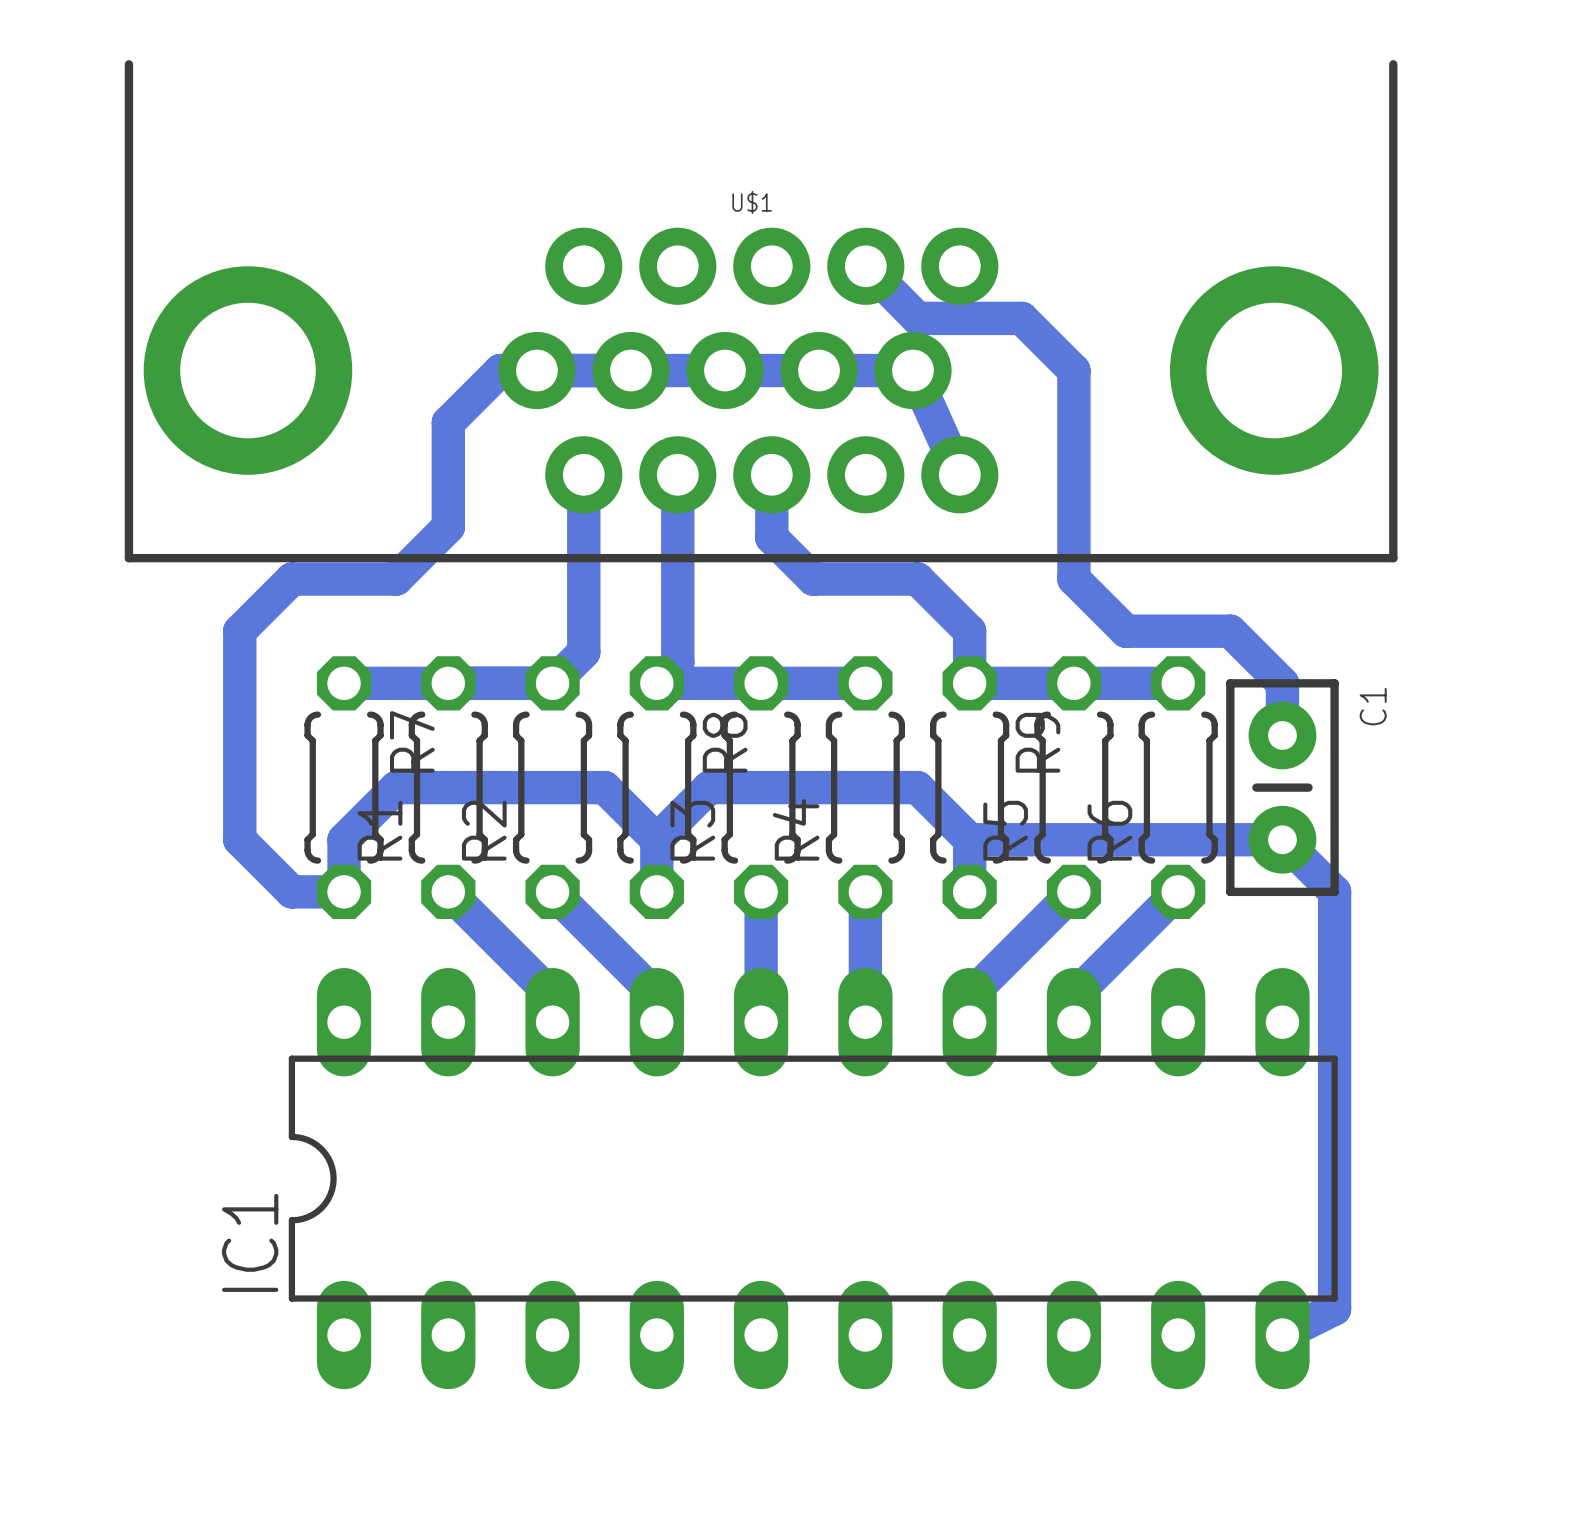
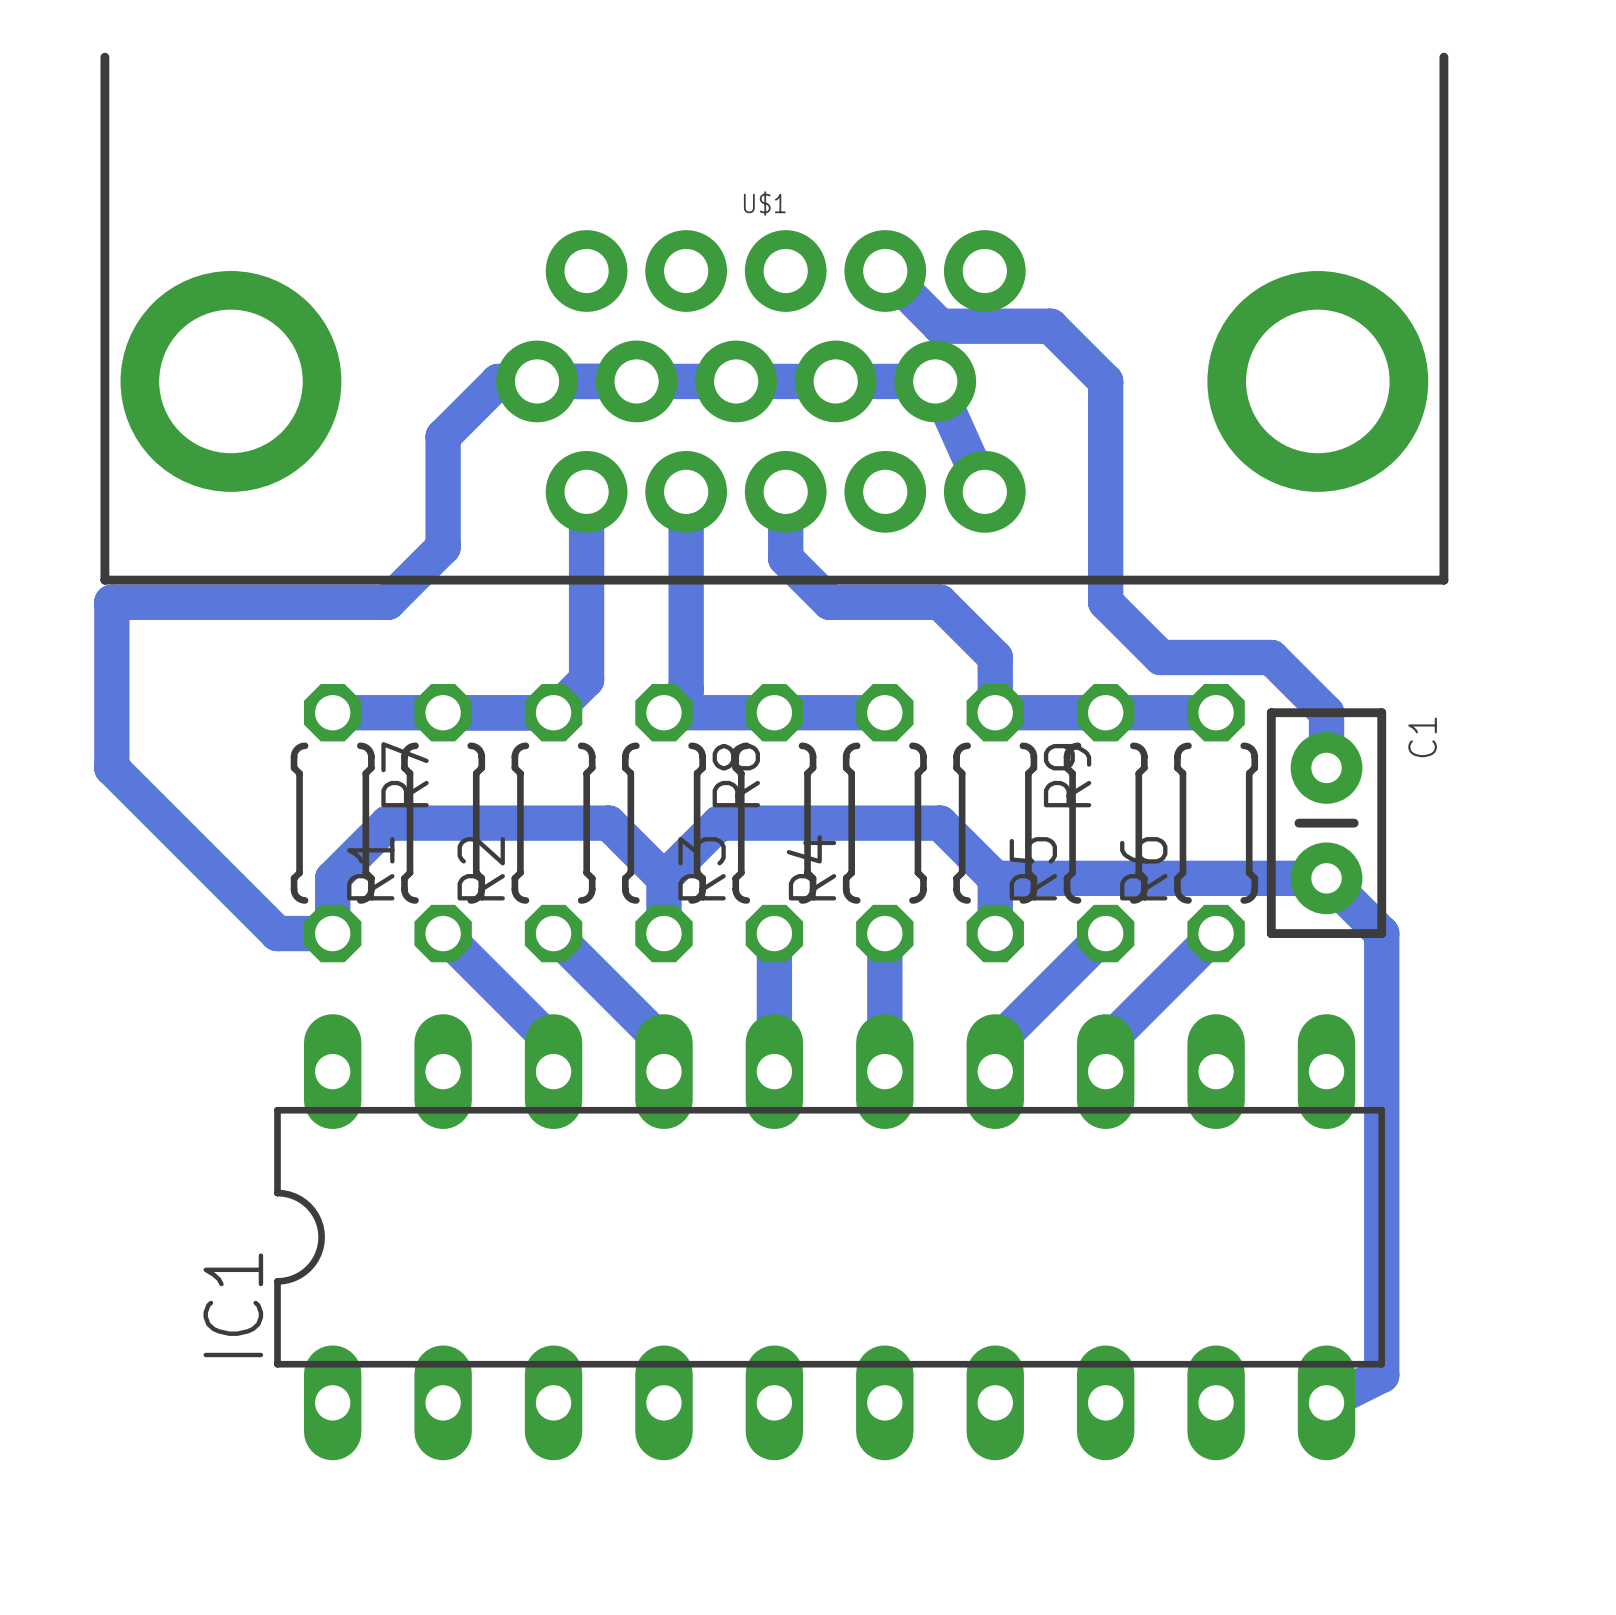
bottom track: (291, 579) (239, 631) (239, 839) -> (277, 602) (111, 602) (111, 767) (222, 878)

